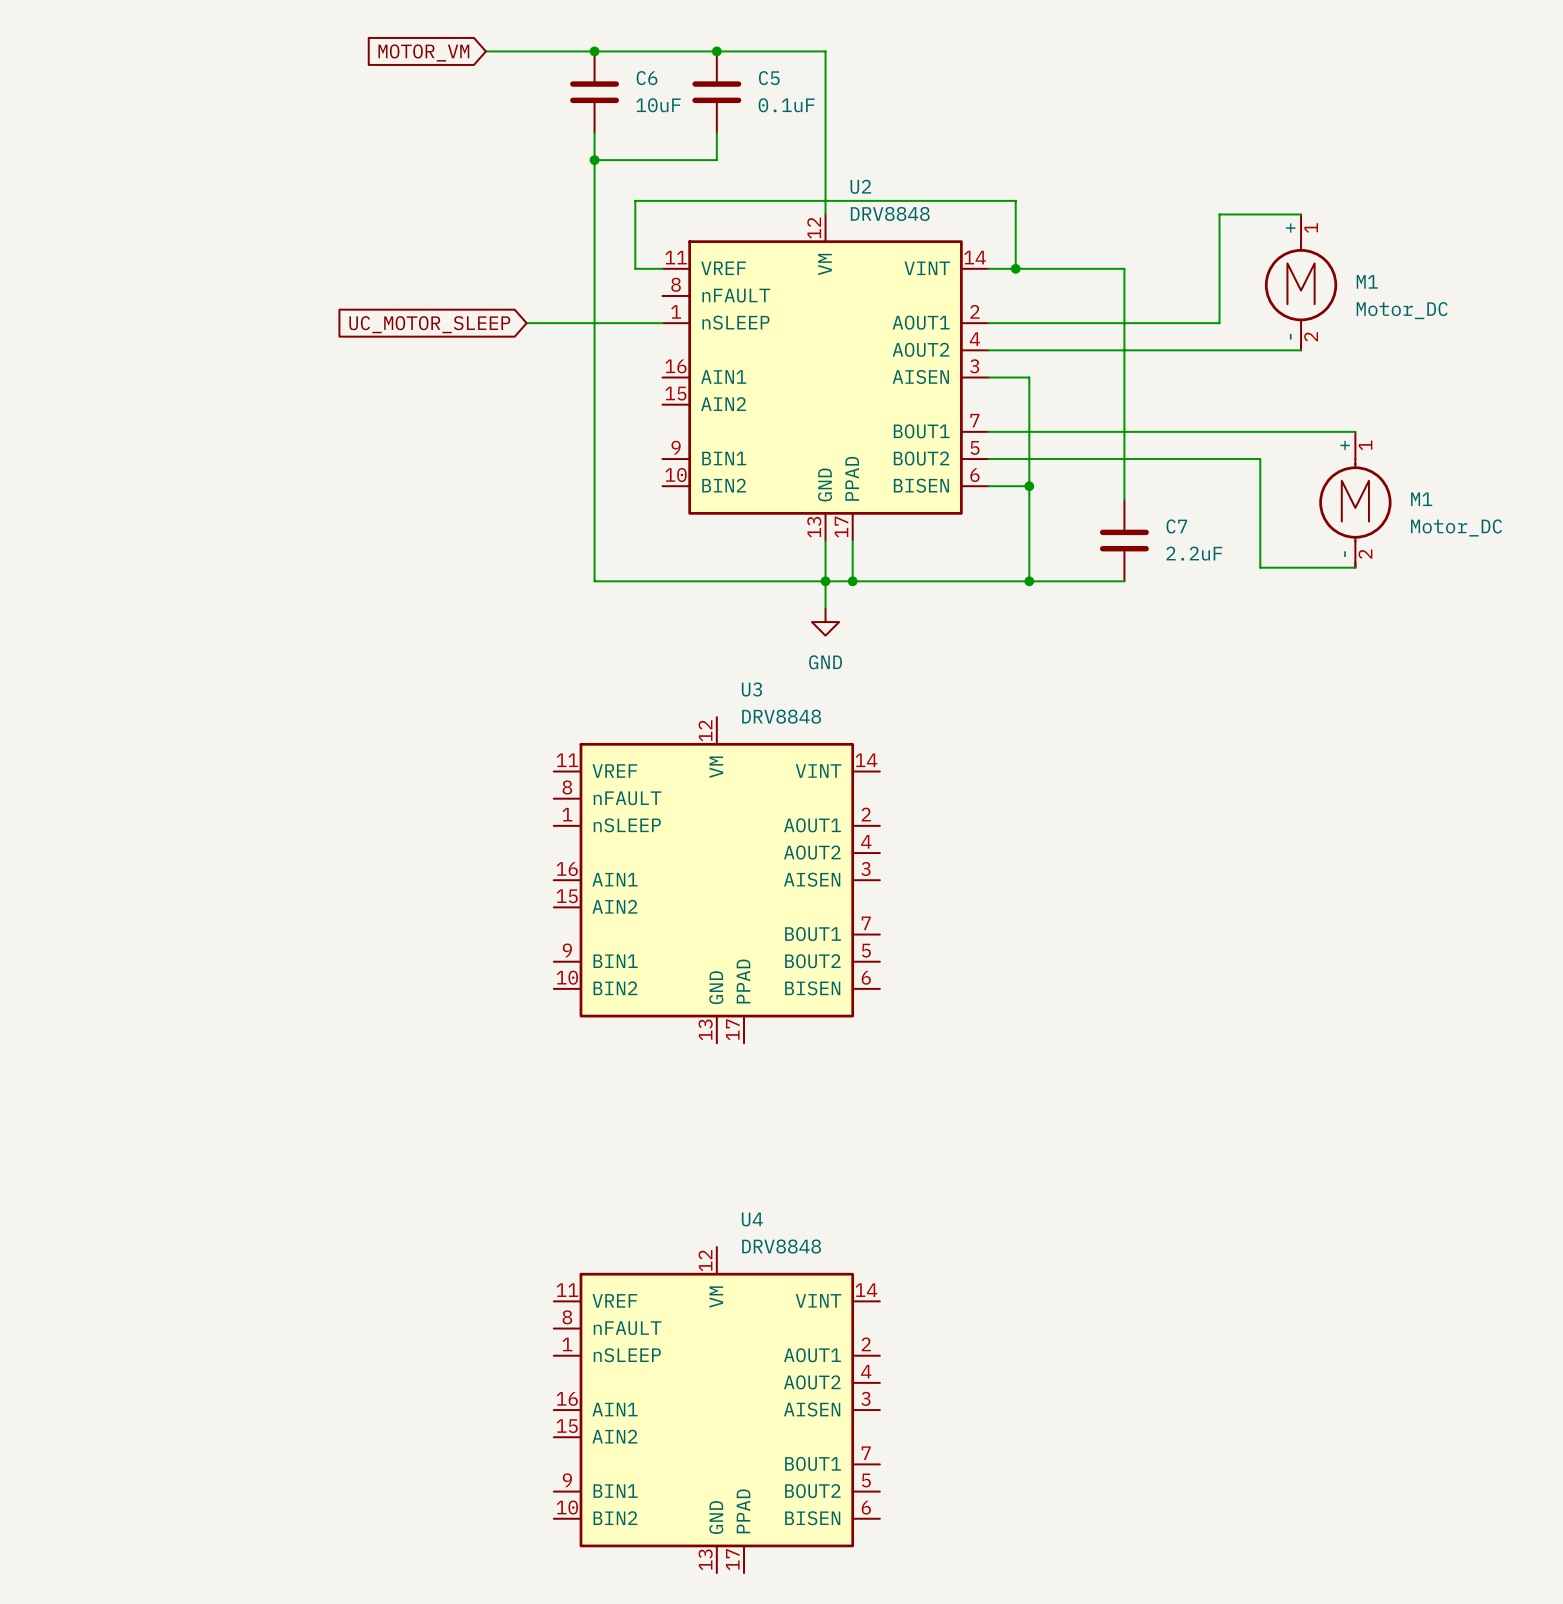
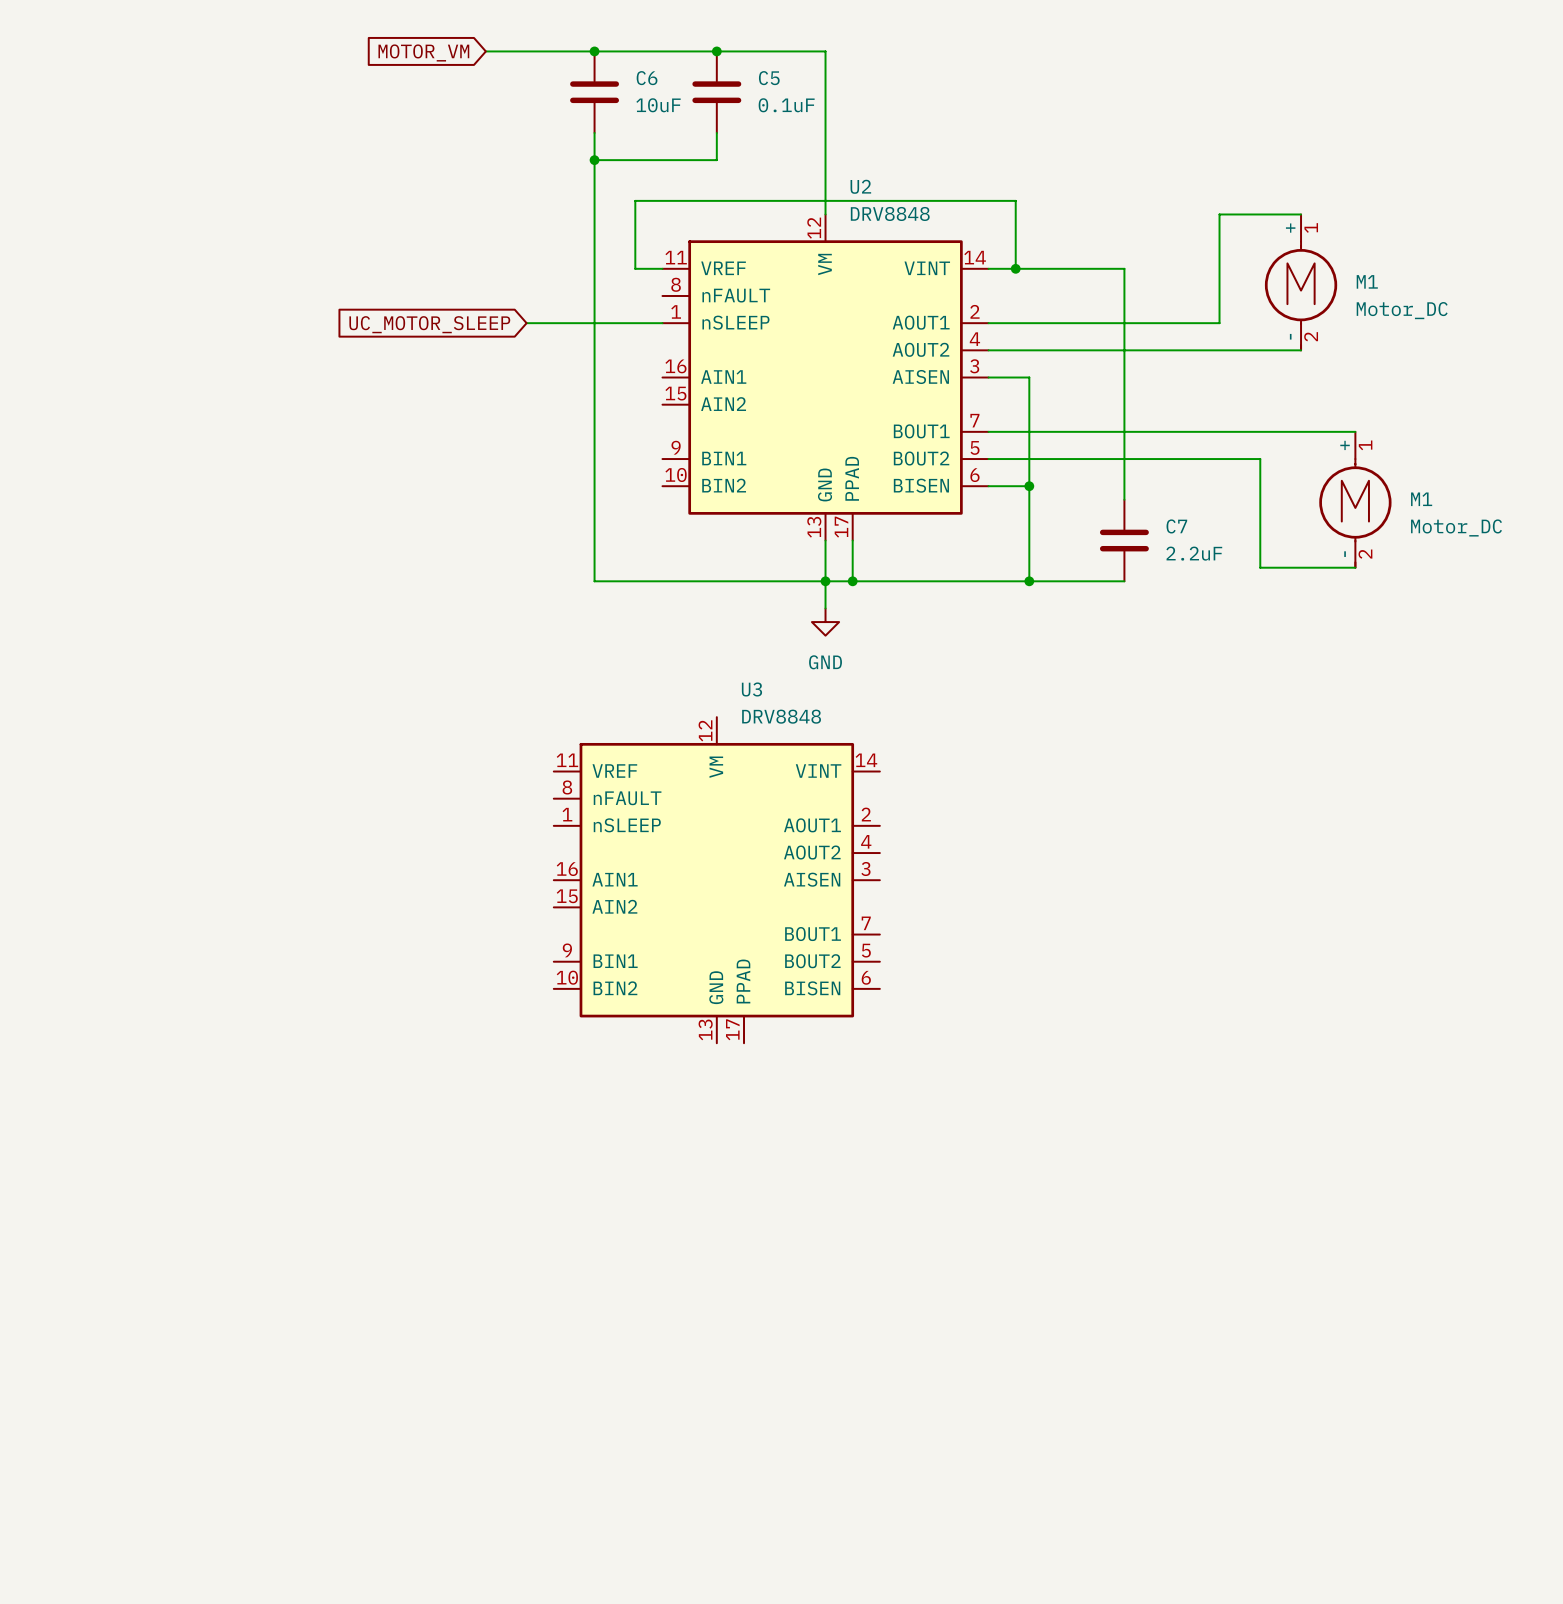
U4: DRV8848 (716, 1410) -> none

